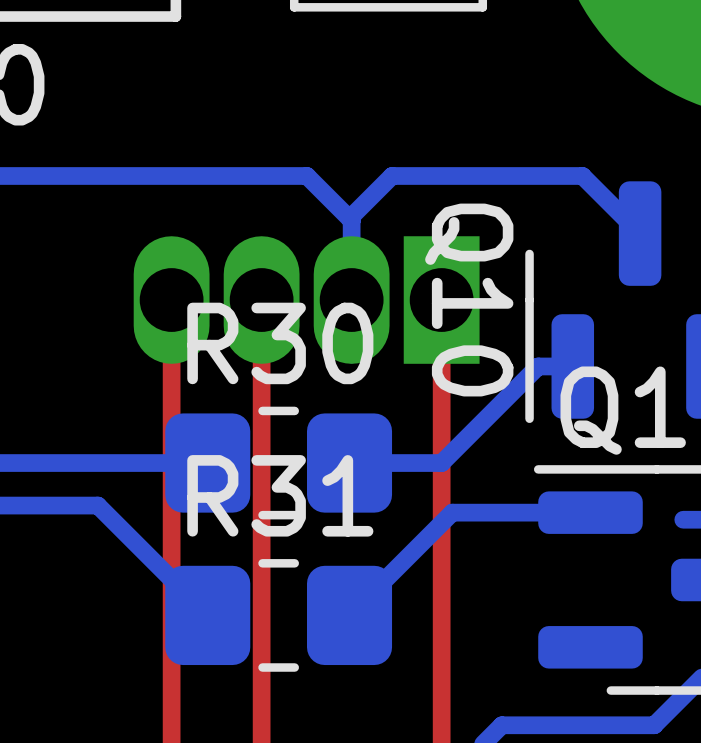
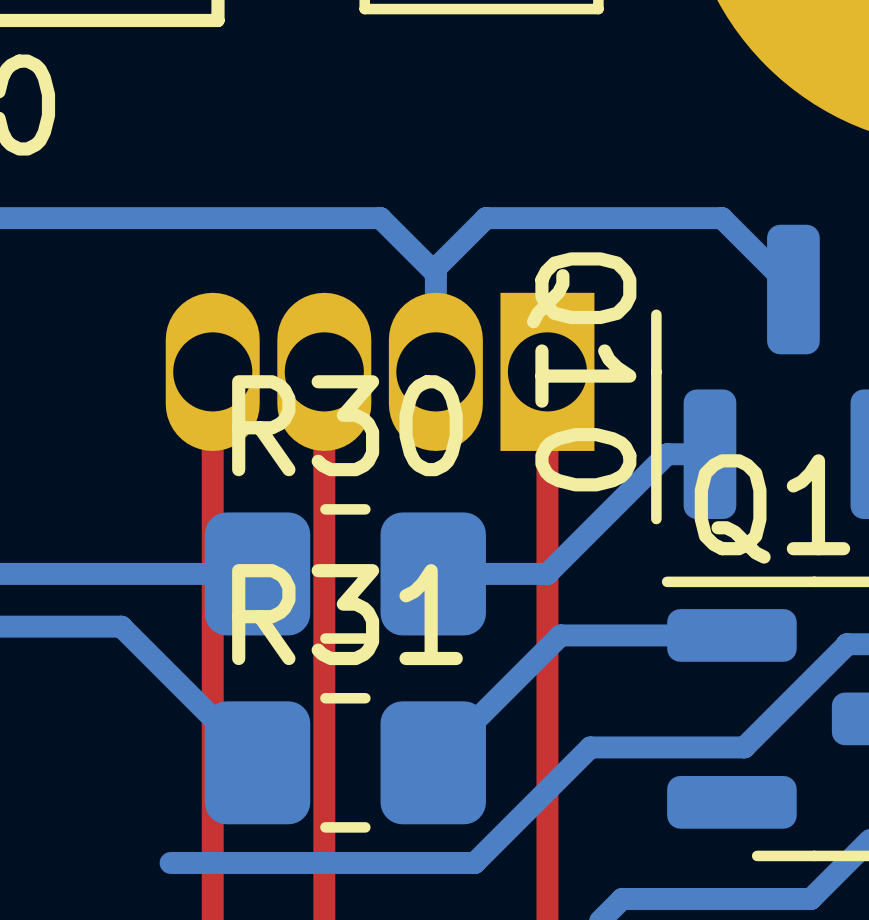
bottom track: none -> (846, 644) (744, 747) (590, 747) (474, 862) (170, 862)

